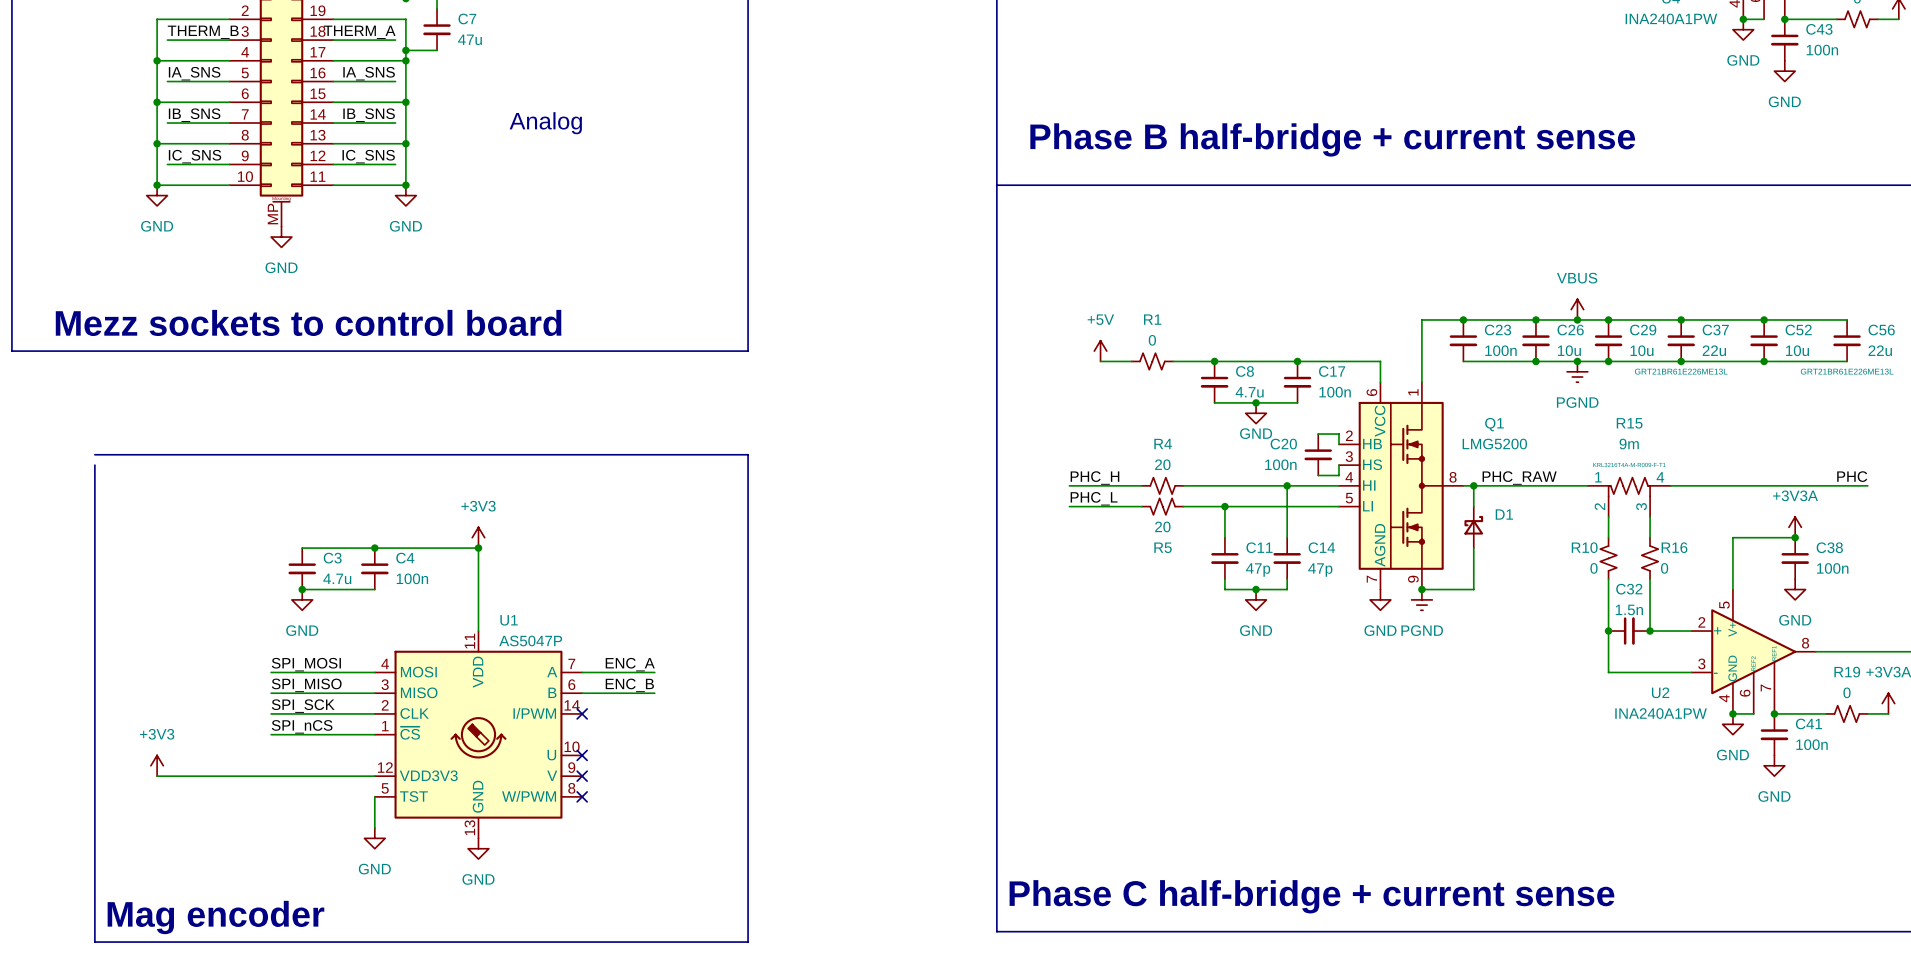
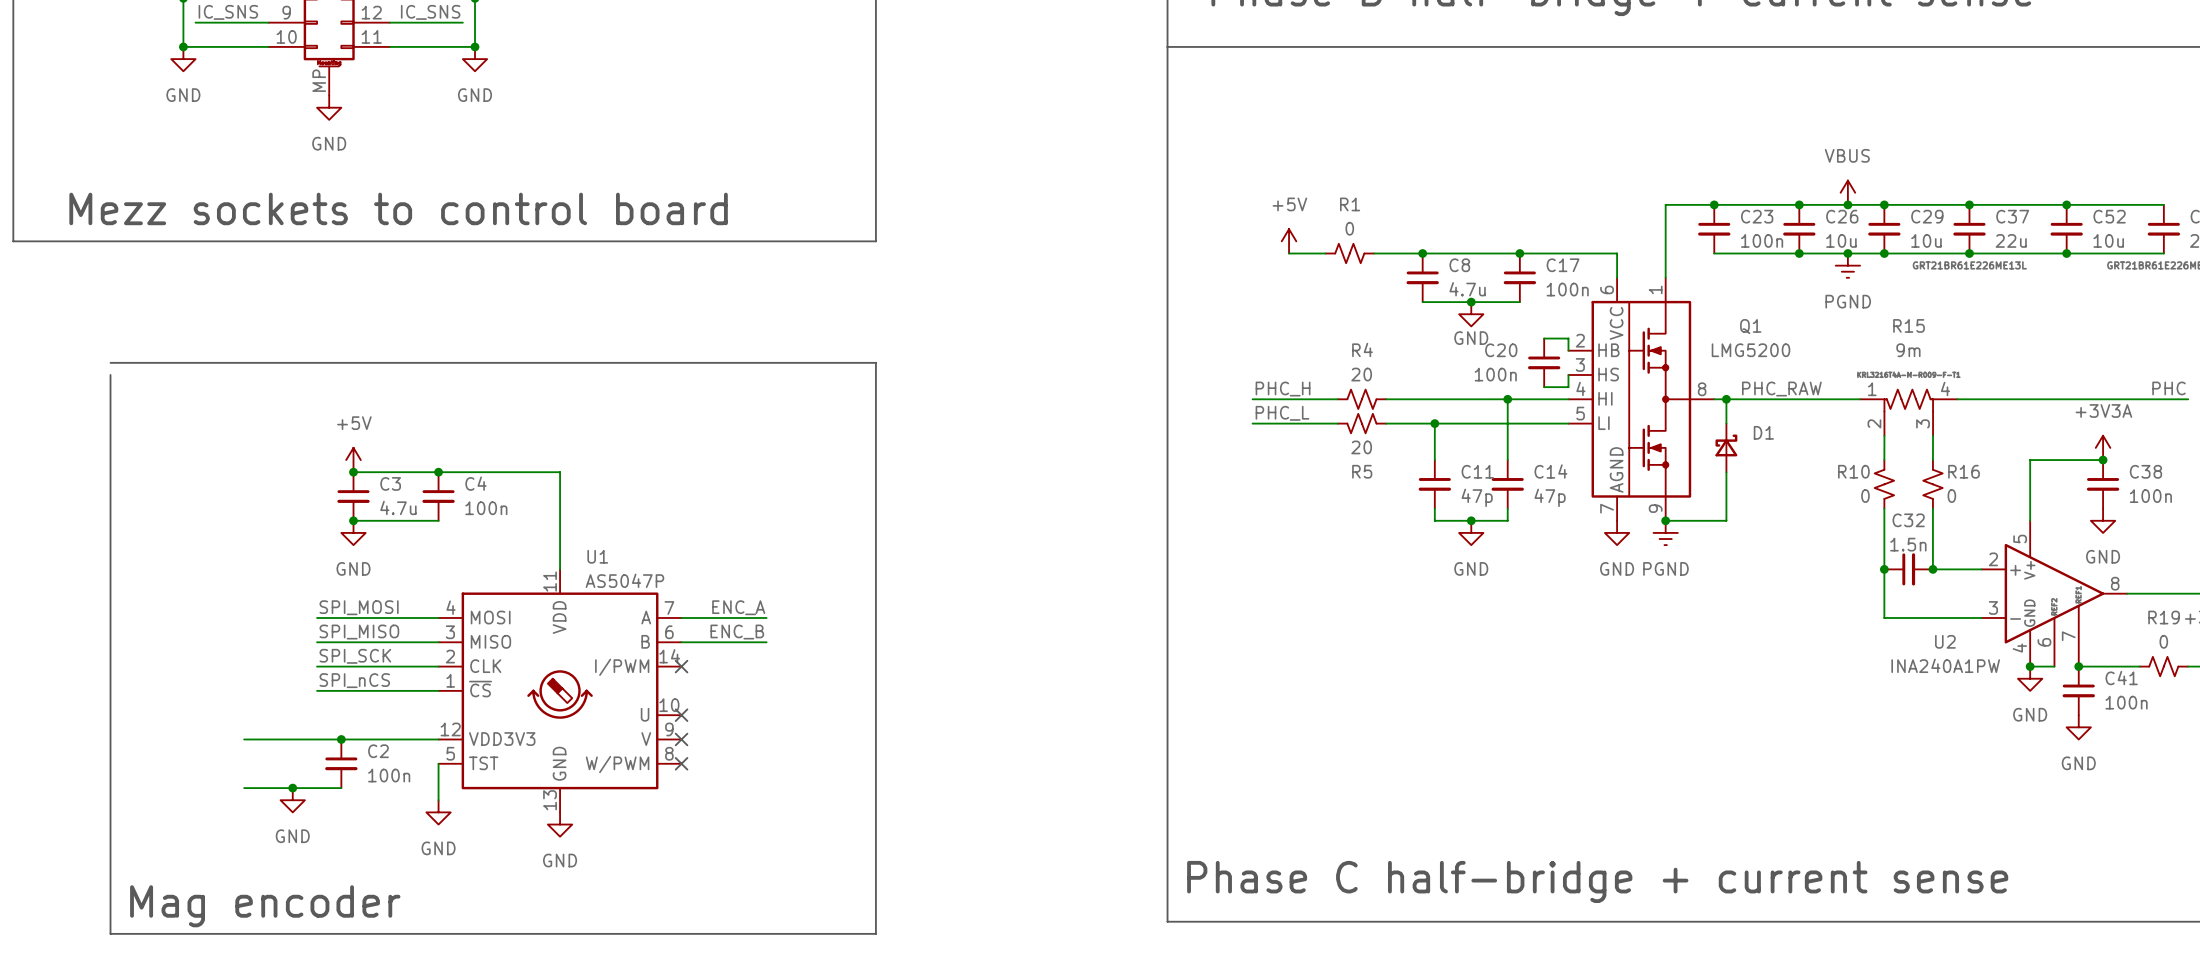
power symbol: none -> +5V (353, 460)
power symbol: +3V3 (478, 537) -> none
junction: none -> (353, 472)
junction: (478, 548) -> none
power symbol: +3V3 (157, 765) -> none
wire: (157, 776) (208, 776) -> none
junction: none -> (341, 739)
C2: none -> 100n (341, 763)
wire: none -> (244, 788) (341, 788)
junction: none -> (292, 788)
power symbol: none -> GND (292, 800)

